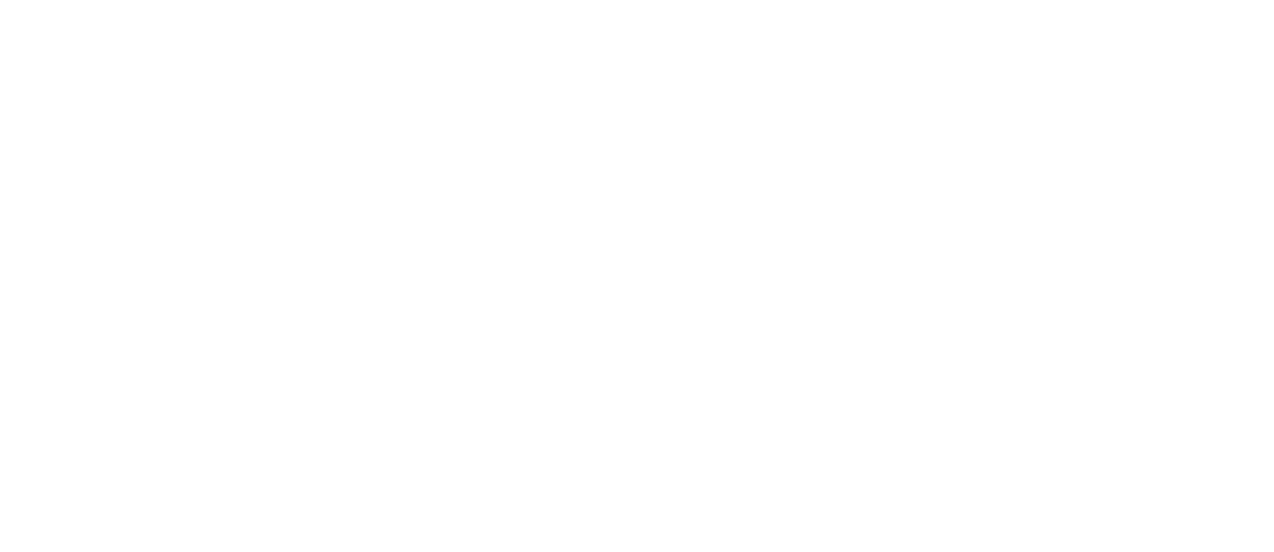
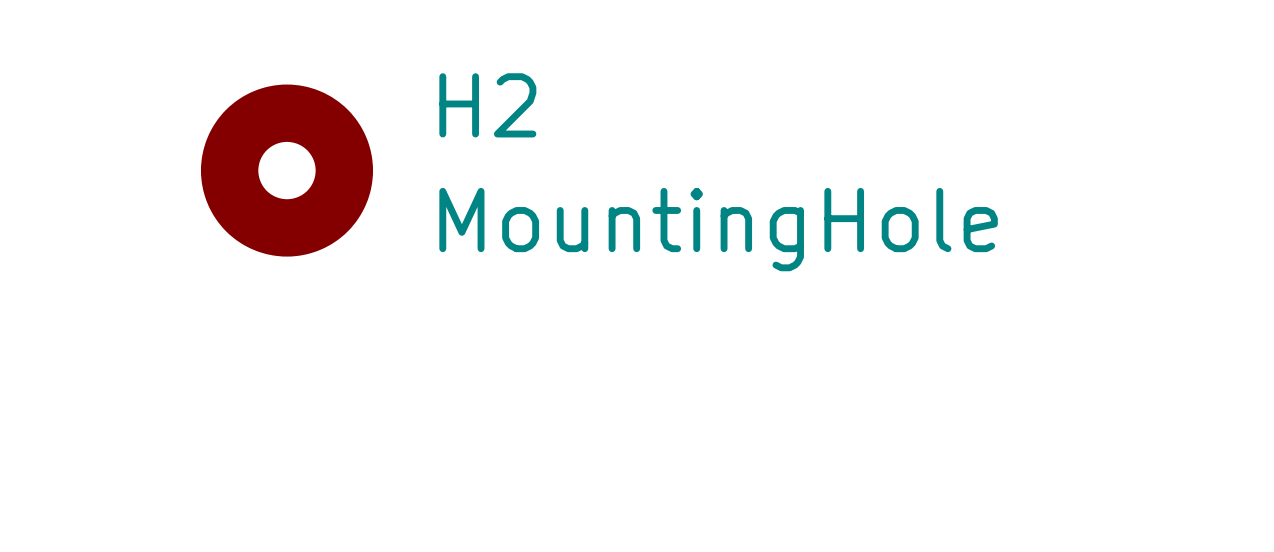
H2: none -> MountingHole (286, 170)

